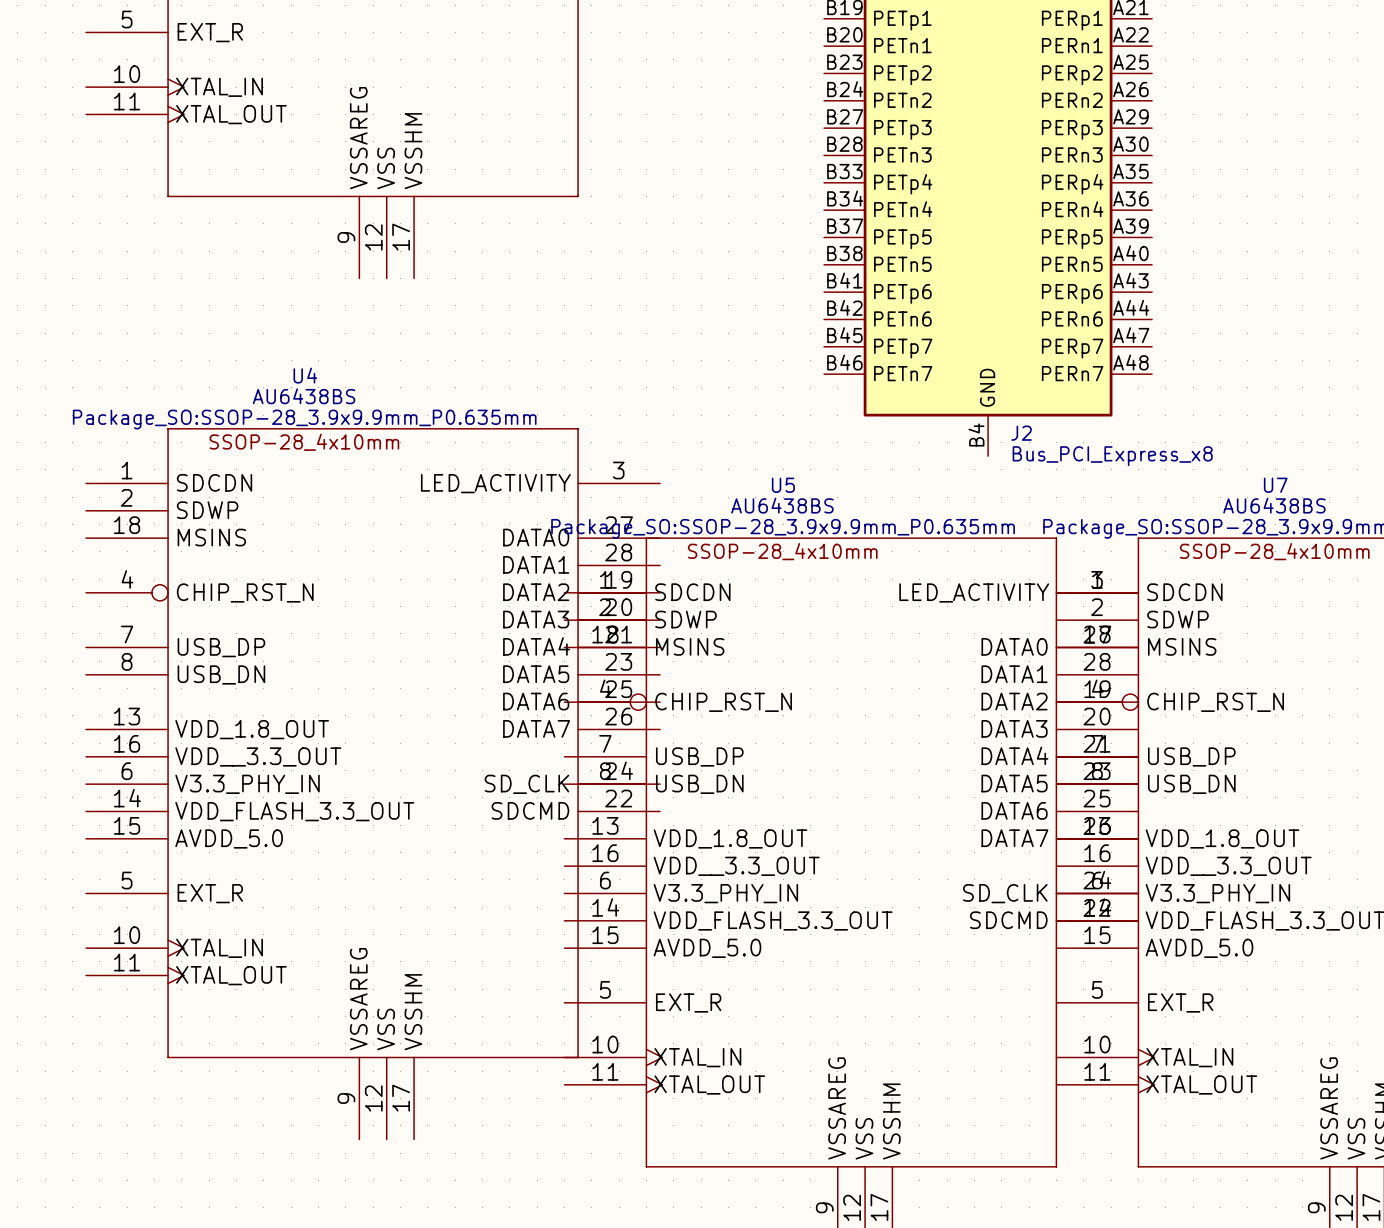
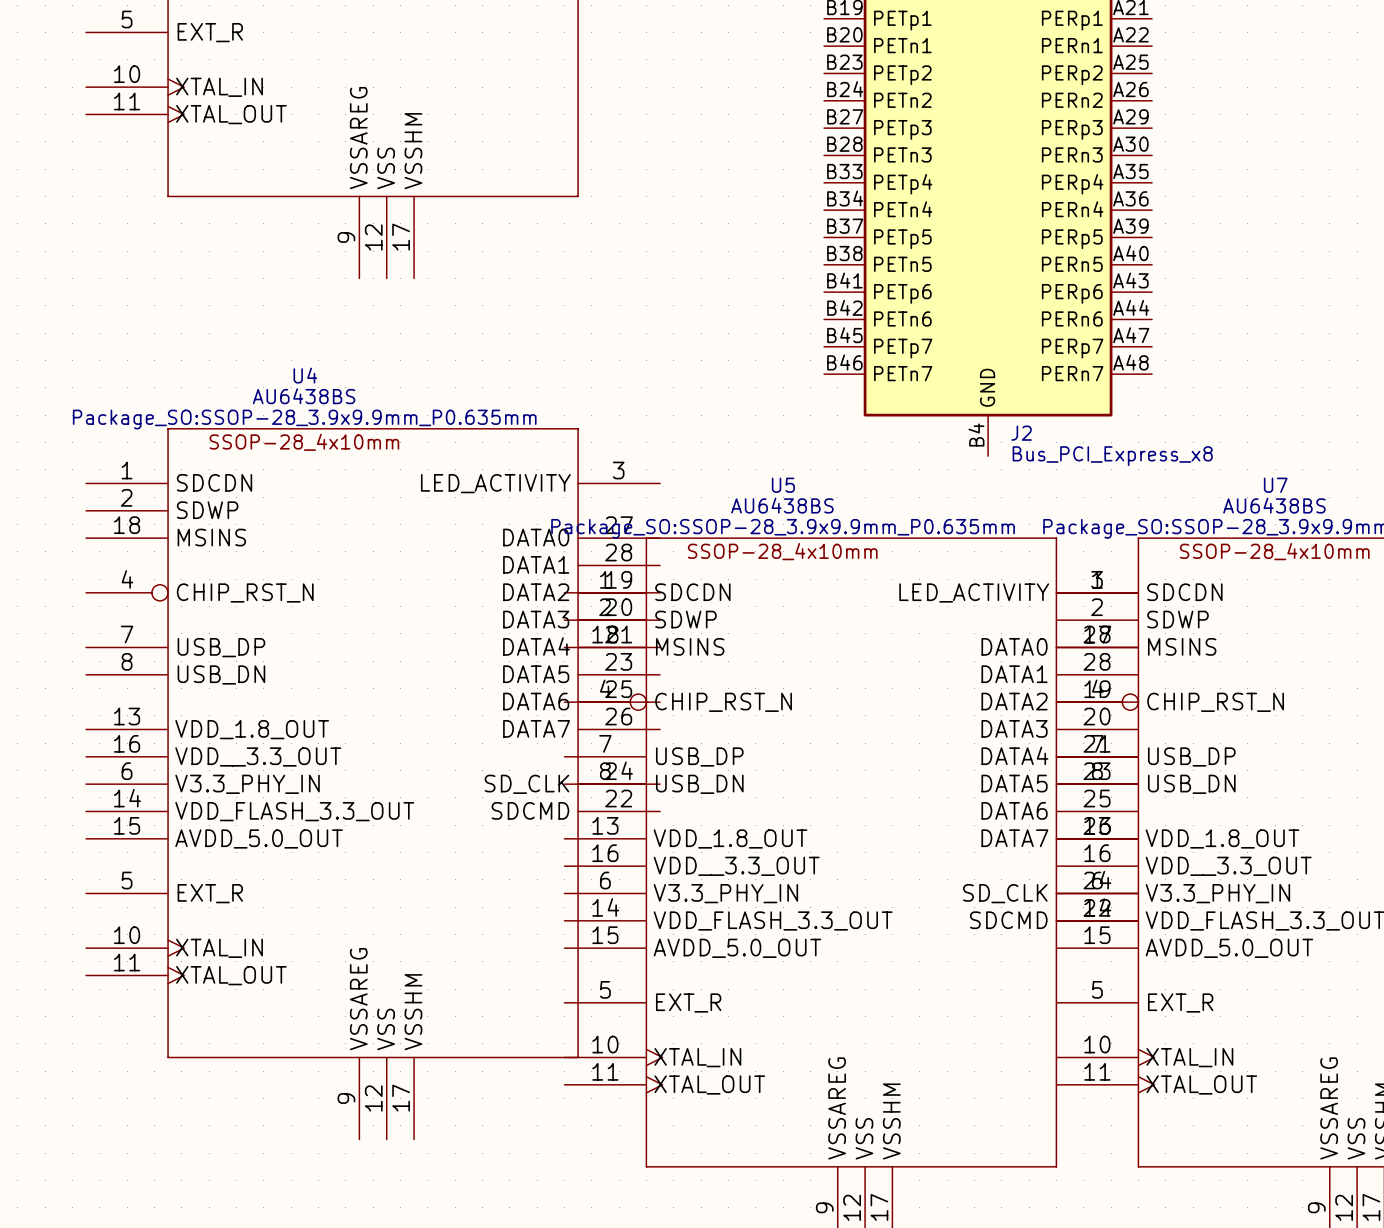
U4 pin name: AVDD_5.0 (229, 838) -> AVDD_5.0_OUT (259, 838)
U5 pin name: AVDD_5.0 (707, 948) -> AVDD_5.0_OUT (737, 948)
U7 pin name: AVDD_5.0 (1199, 948) -> AVDD_5.0_OUT (1229, 948)

